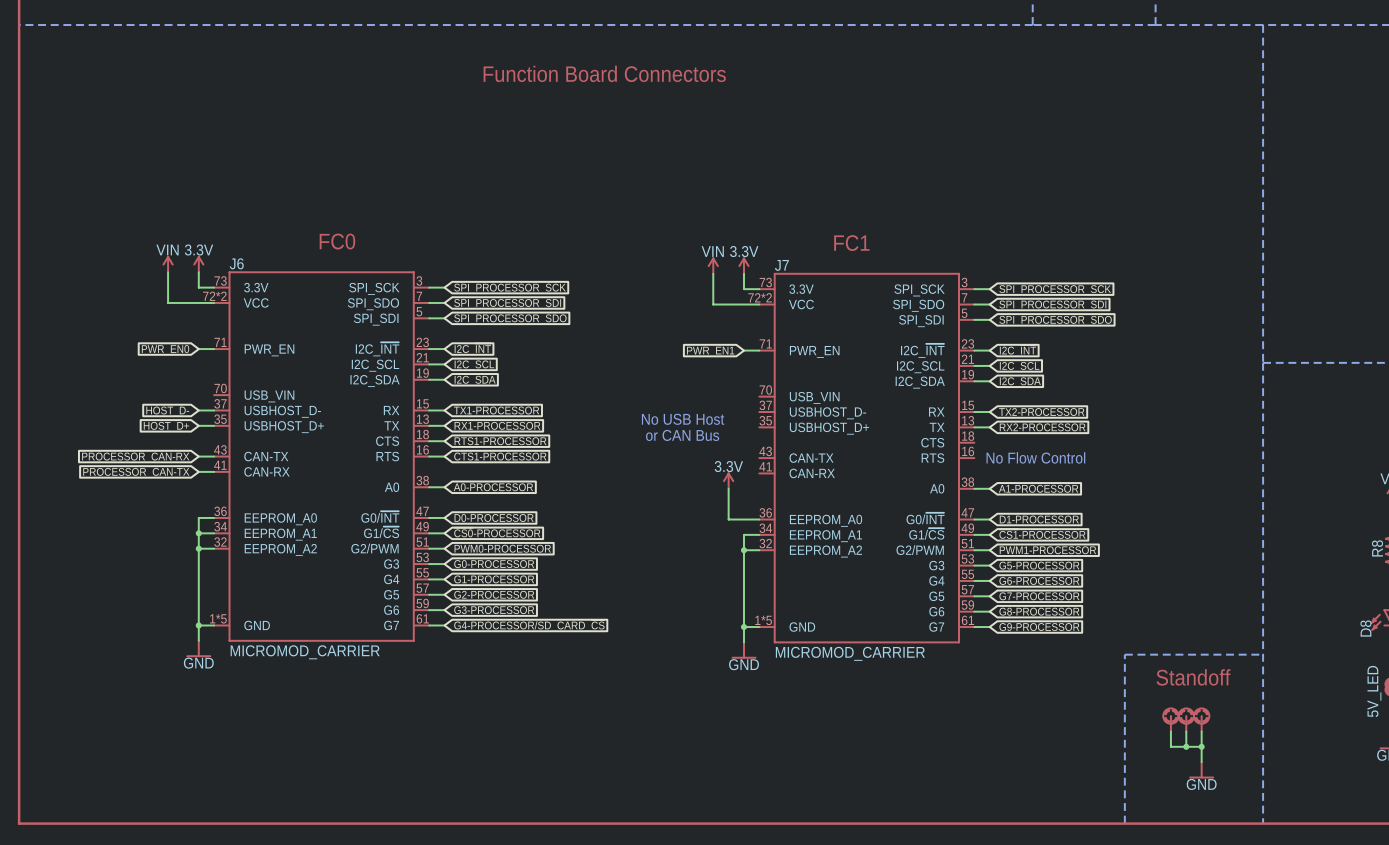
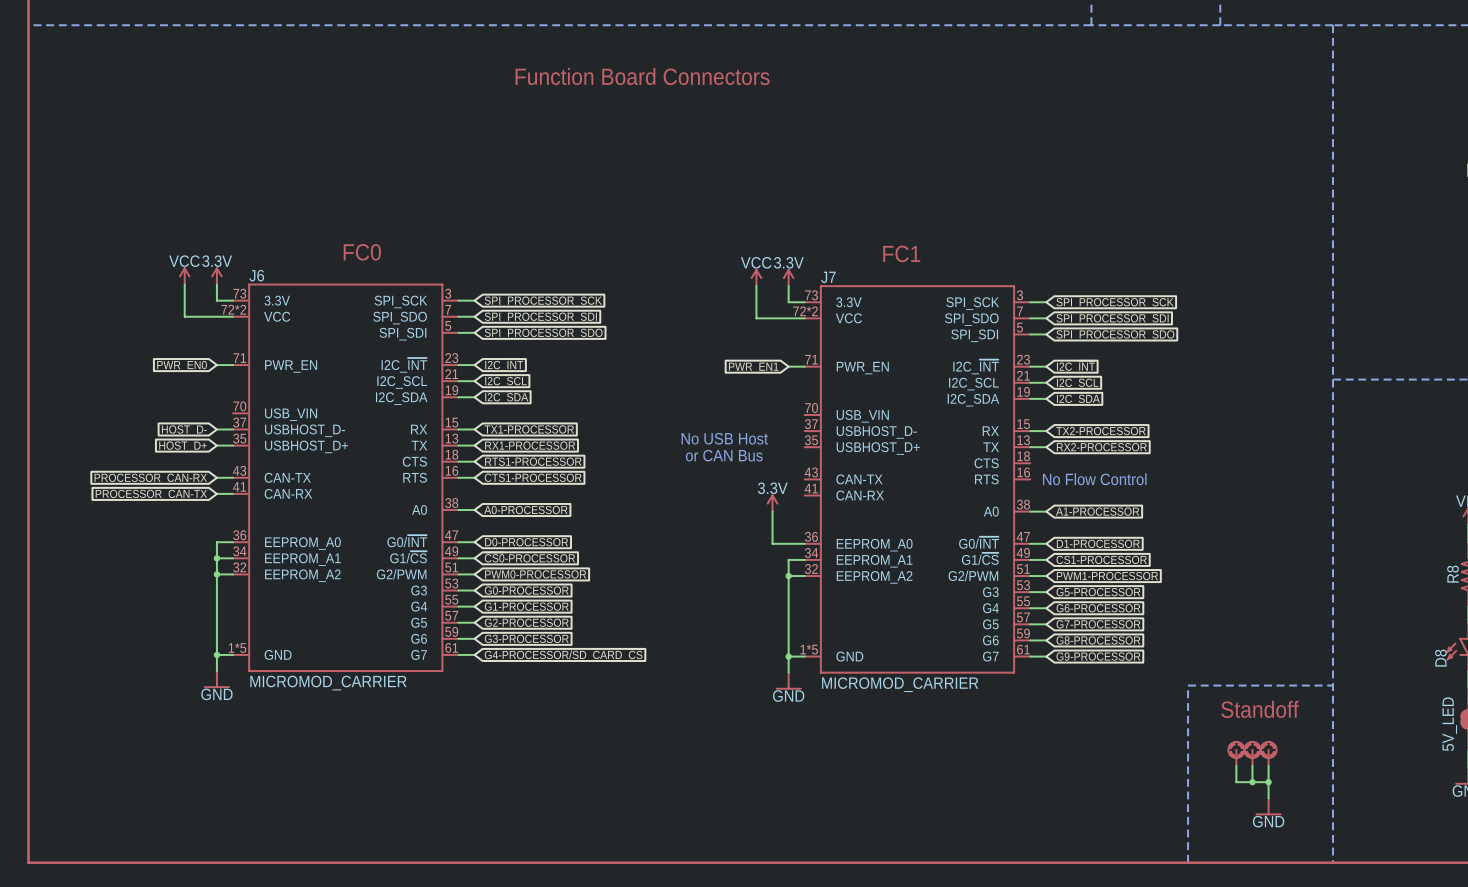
power symbol: VIN (168, 264) -> VCC (184, 276)
power symbol: VIN (713, 265) -> VCC (756, 277)

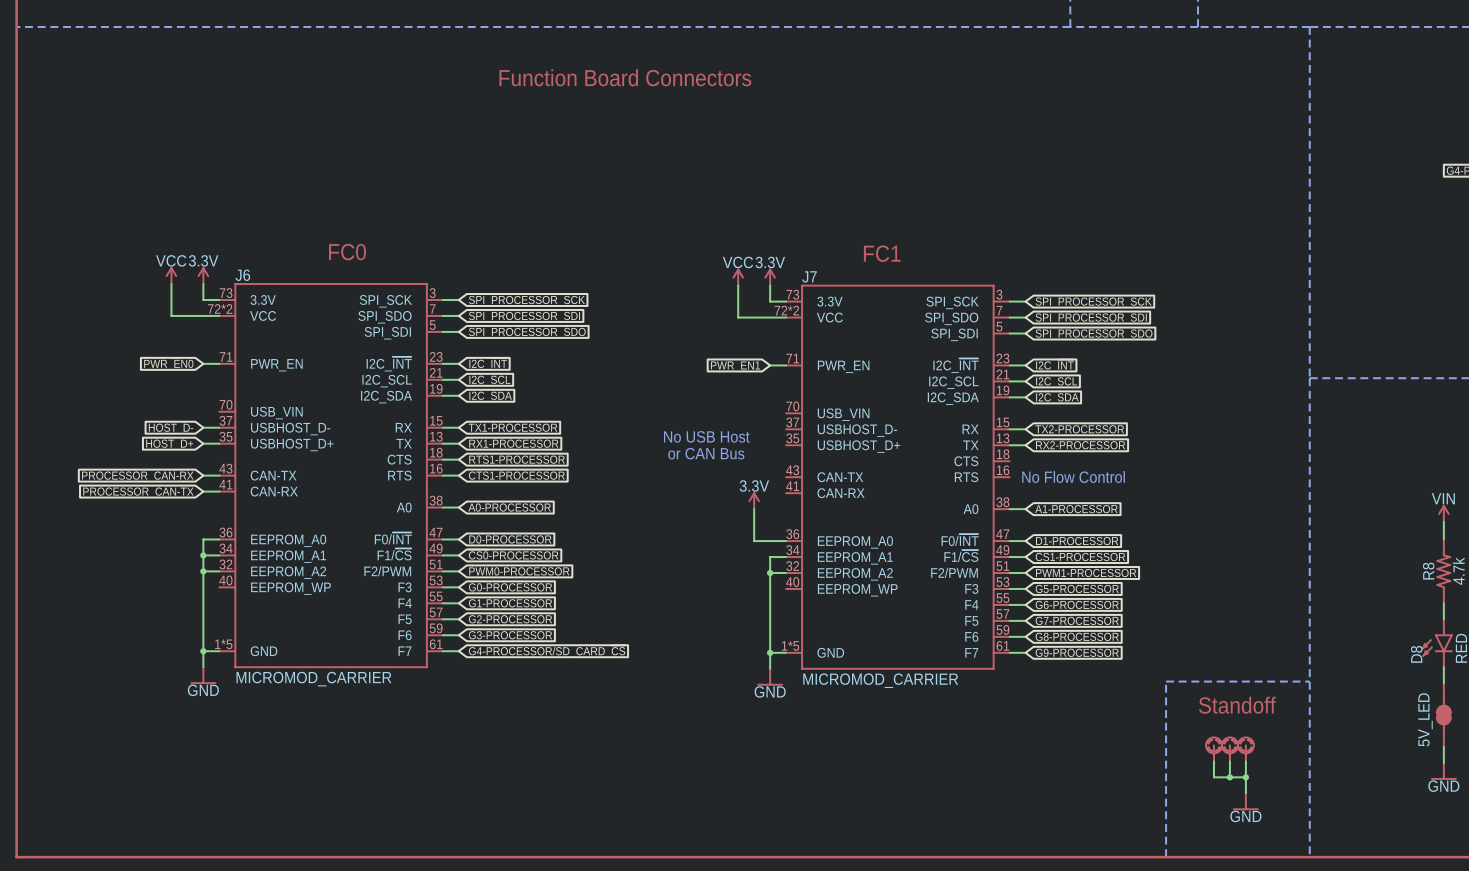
J6 symbol: [233, 283, 459, 672] -> [219, 283, 443, 668]
J7 symbol: [804, 285, 1031, 674] -> [786, 284, 1010, 670]

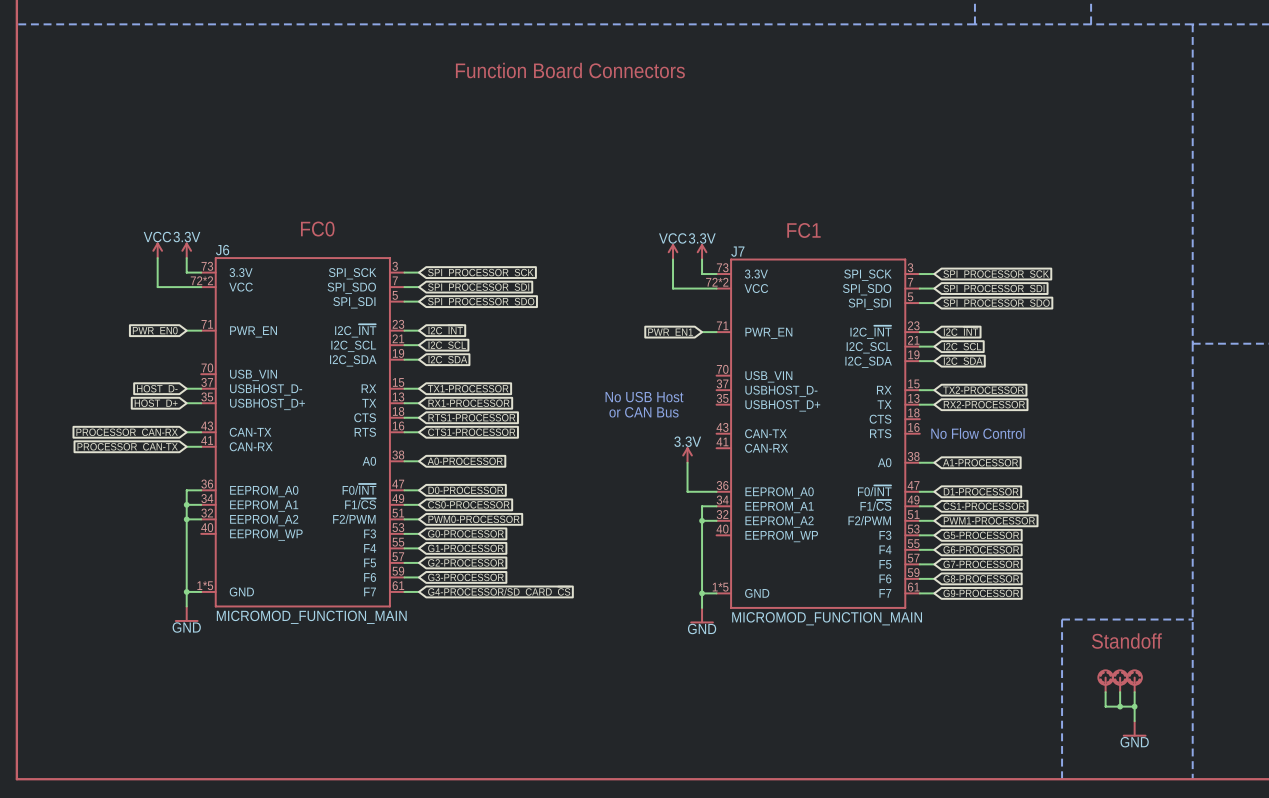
J6 value: MICROMOD_CARRIER (313, 679) -> MICROMOD_FUNCTION_MAIN (311, 617)
J7 value: MICROMOD_CARRIER (880, 680) -> MICROMOD_FUNCTION_MAIN (827, 618)

